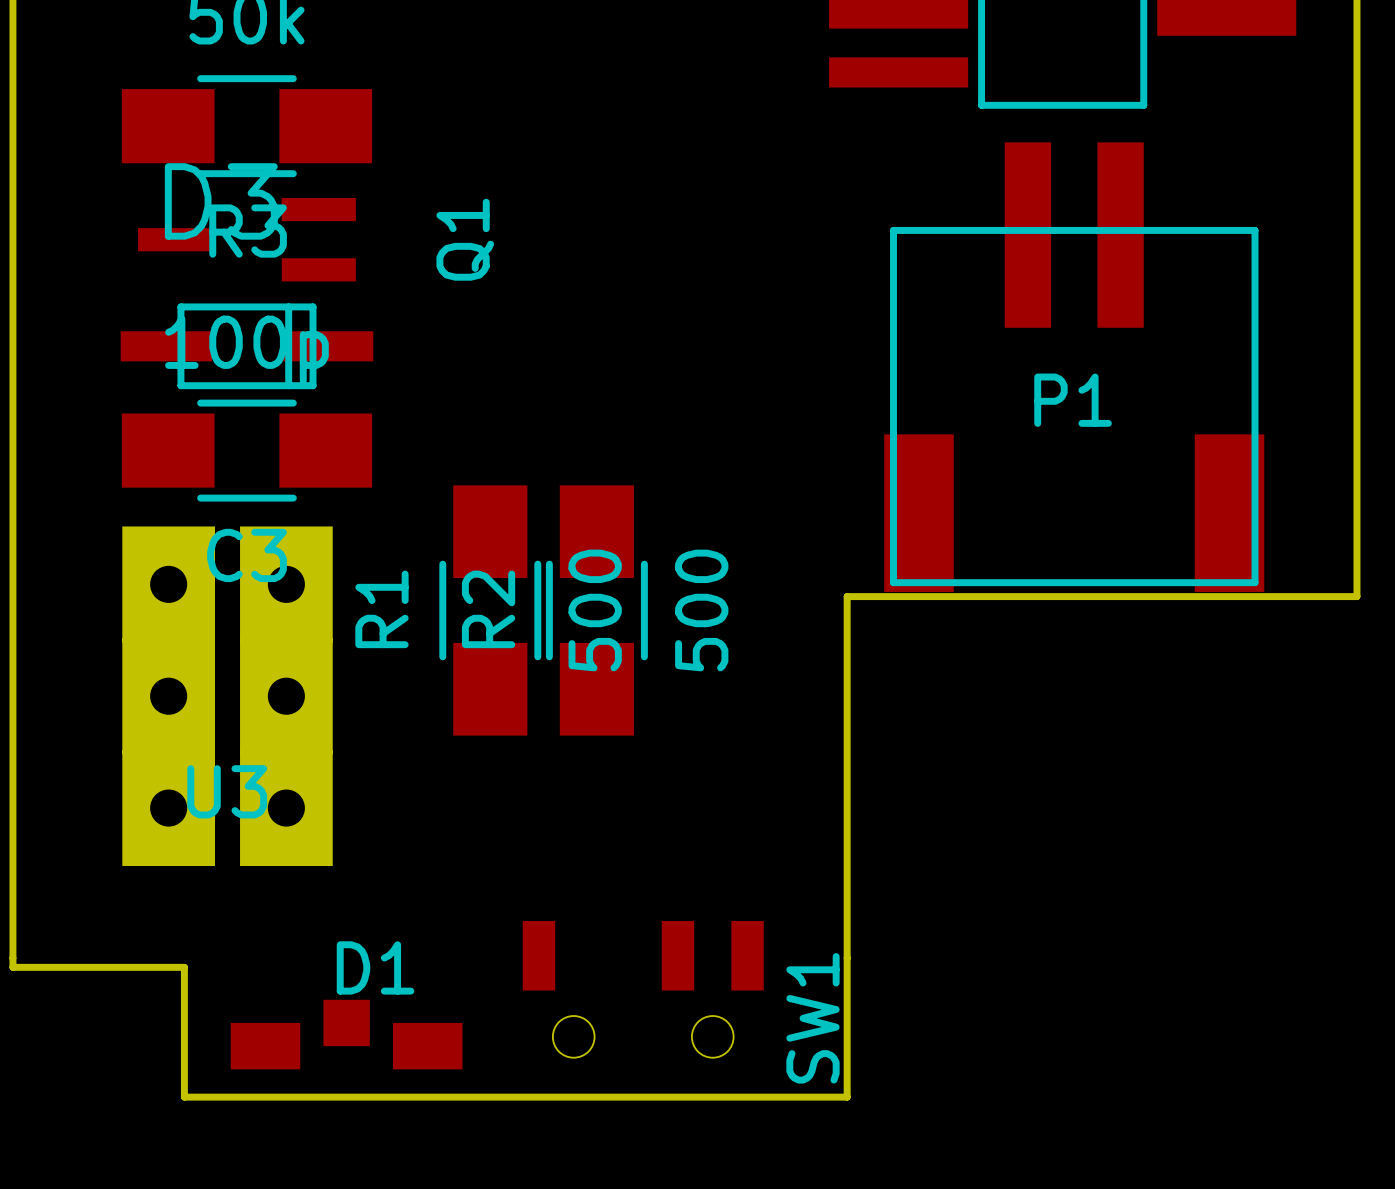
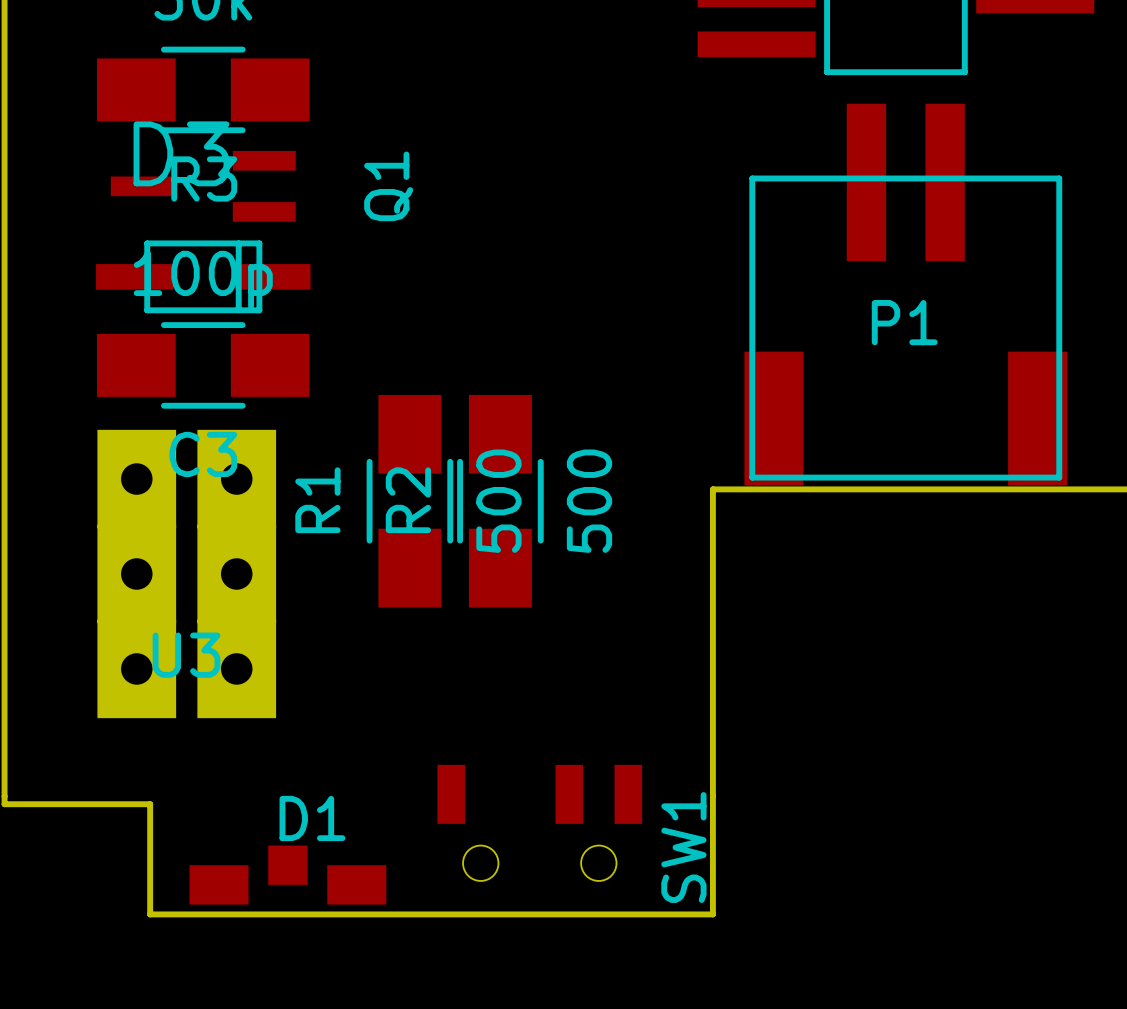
D1 position: (346, 1034) -> (287, 875)

